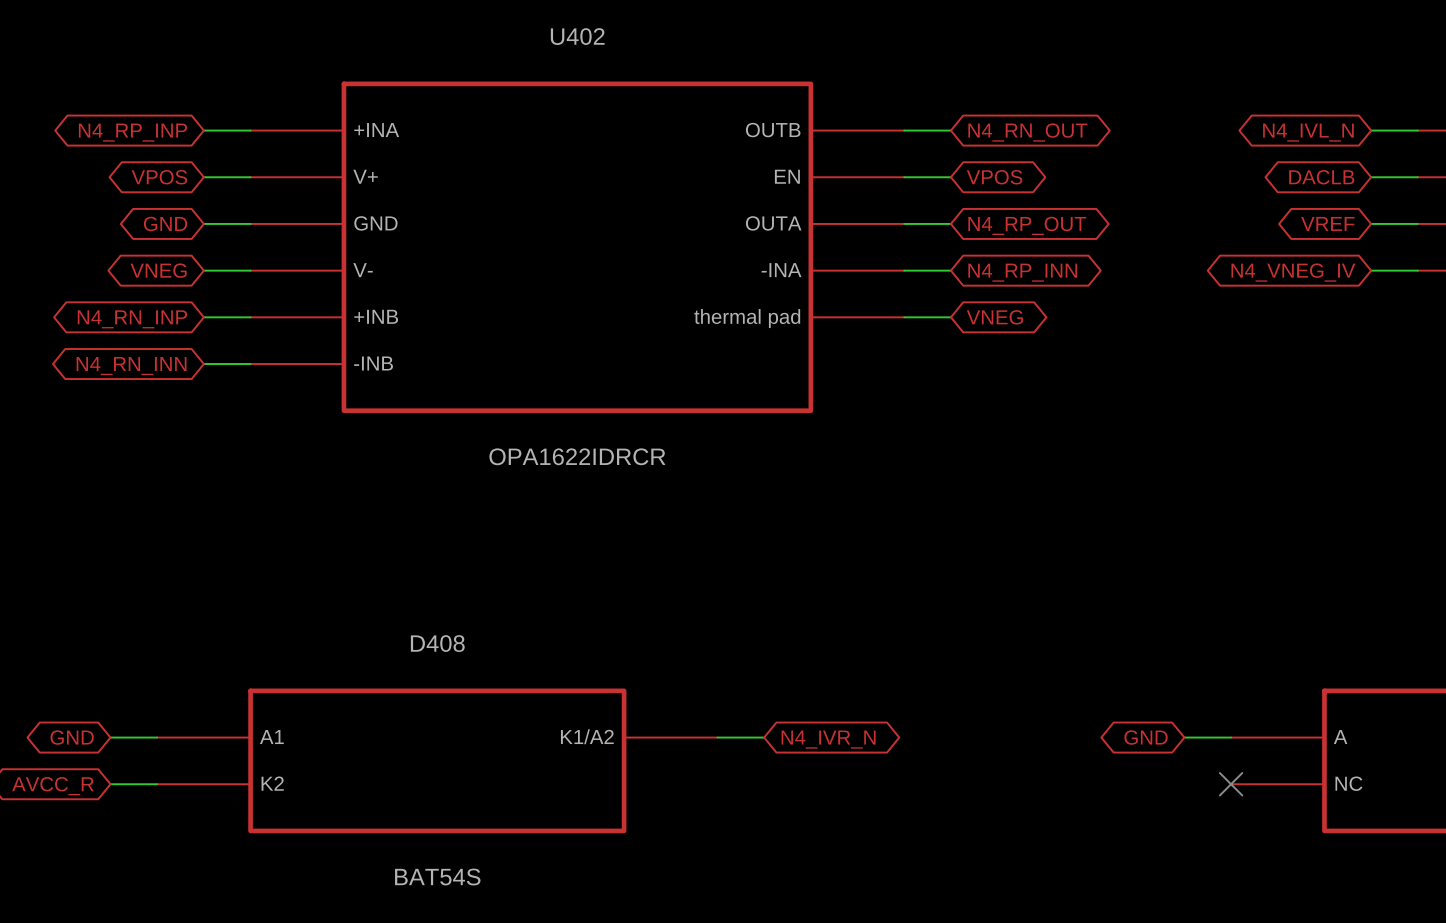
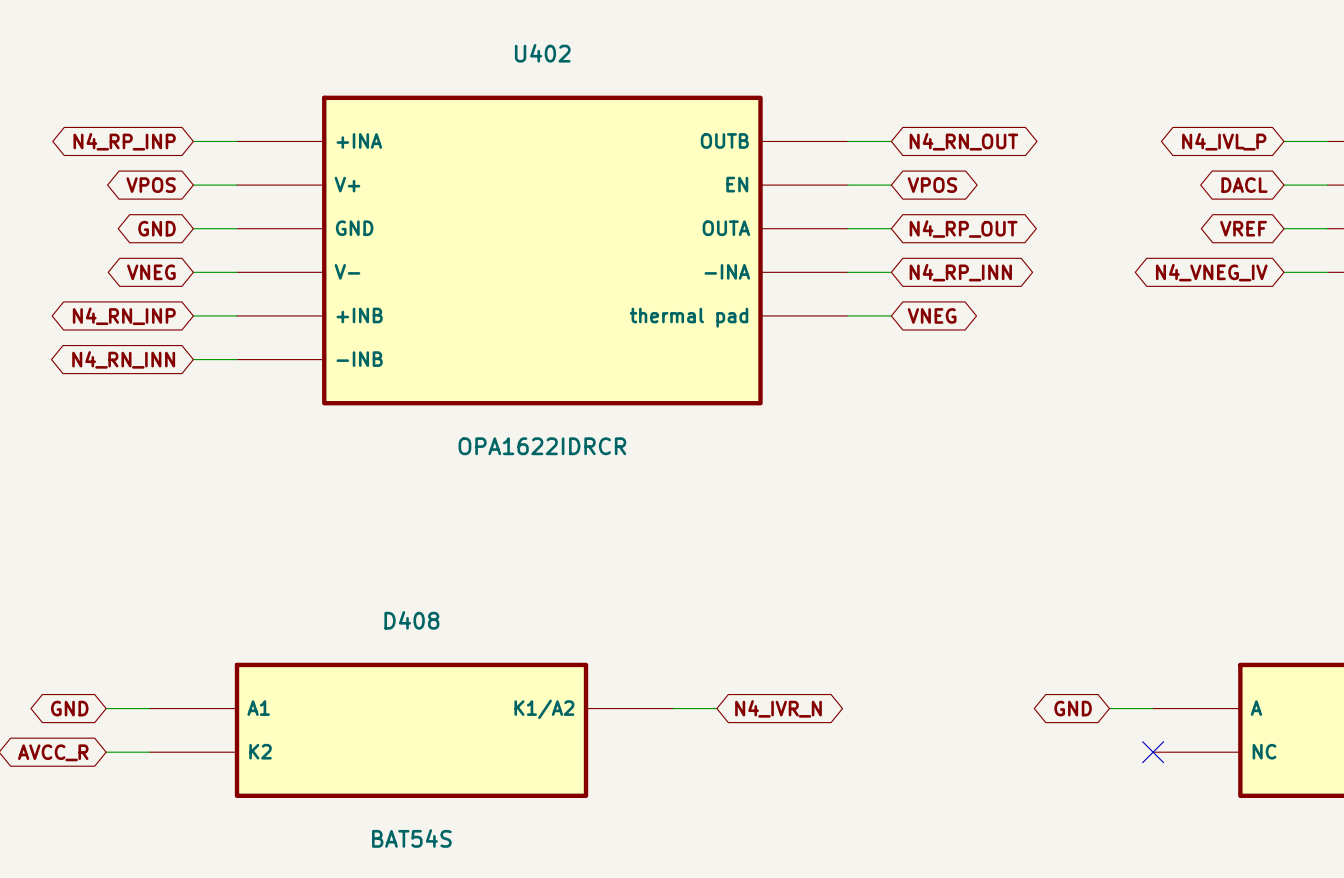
global label: N4_IVL_N (1308, 132) -> N4_IVL_P (1224, 141)
global label: DACLB (1321, 177) -> DACL (1244, 185)

